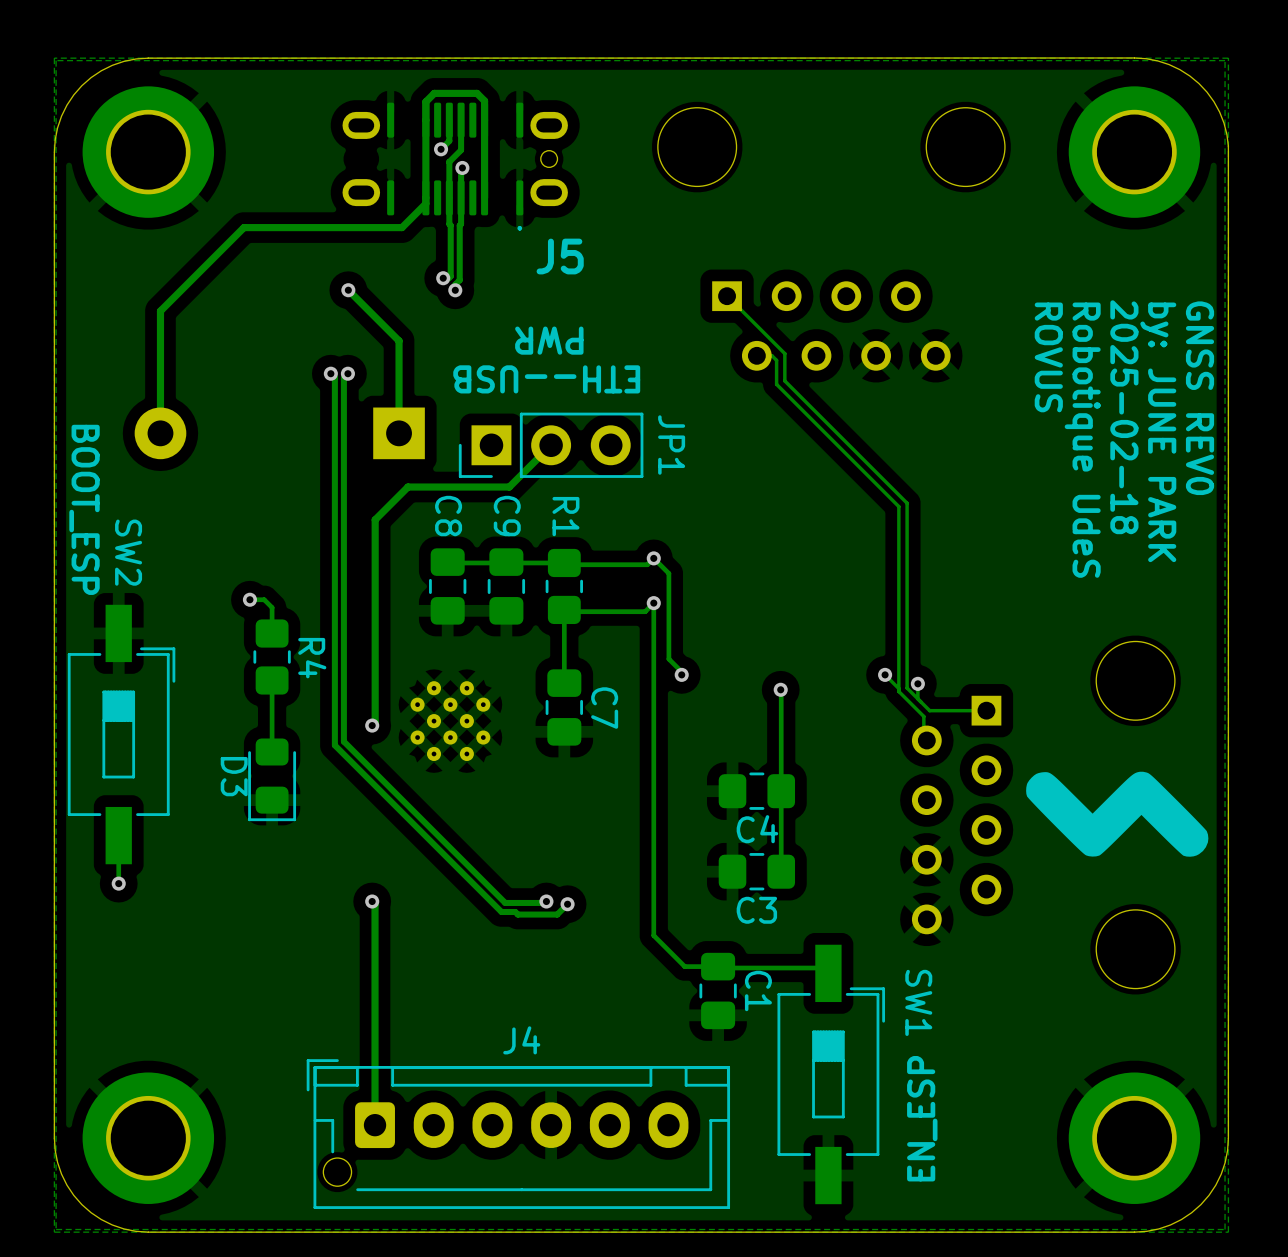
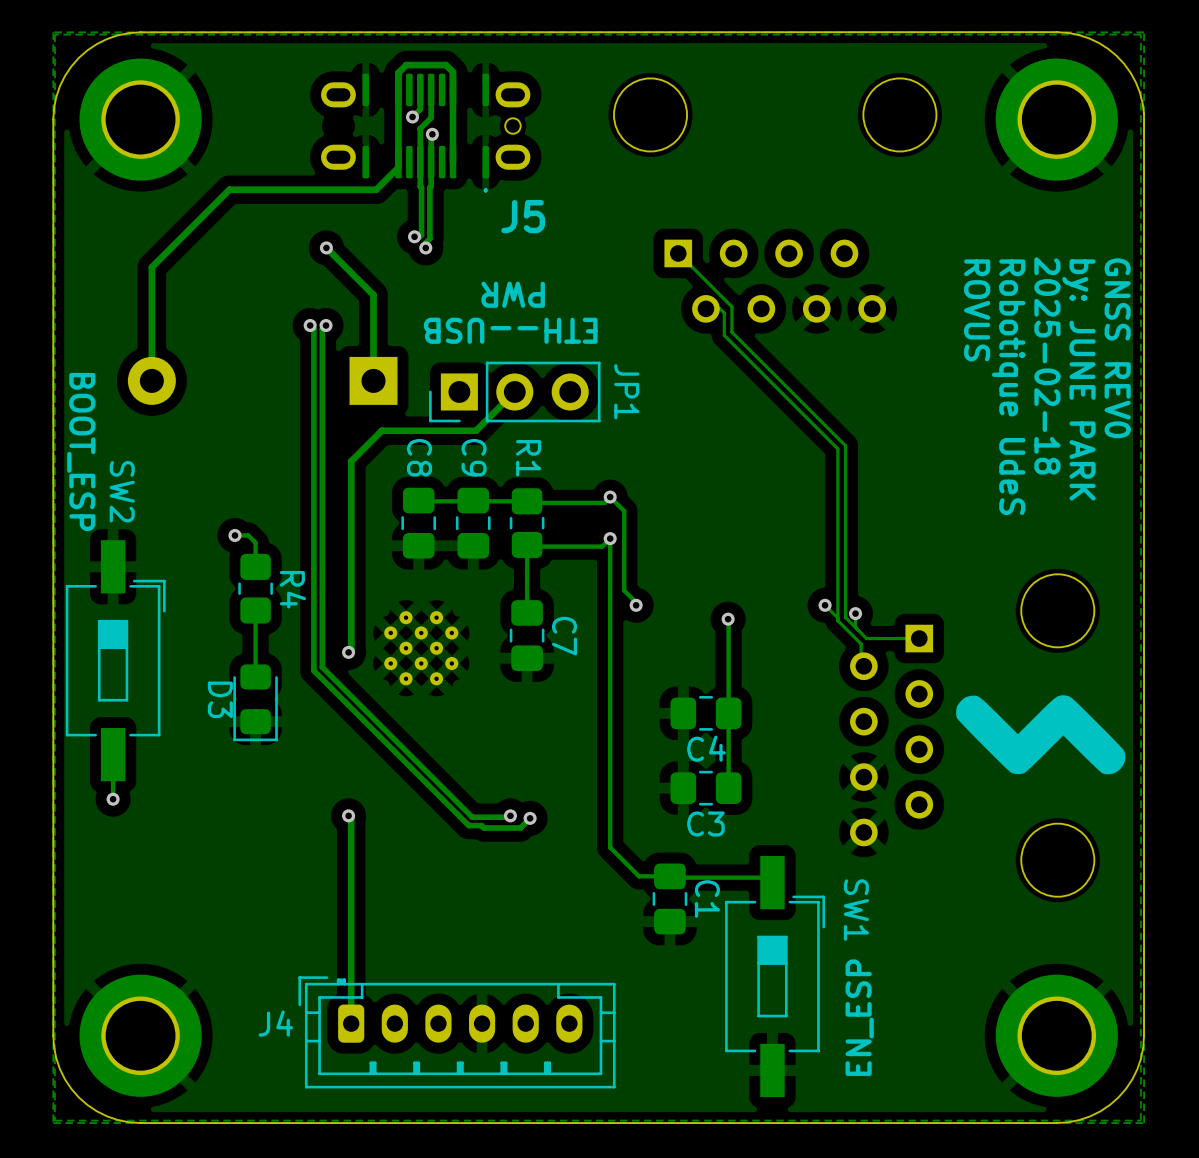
J4 name position: J4 (521, 1040) -> J4 (275, 1023)
J4 footprint: [306, 1059, 731, 1209] -> [298, 976, 616, 1089]

